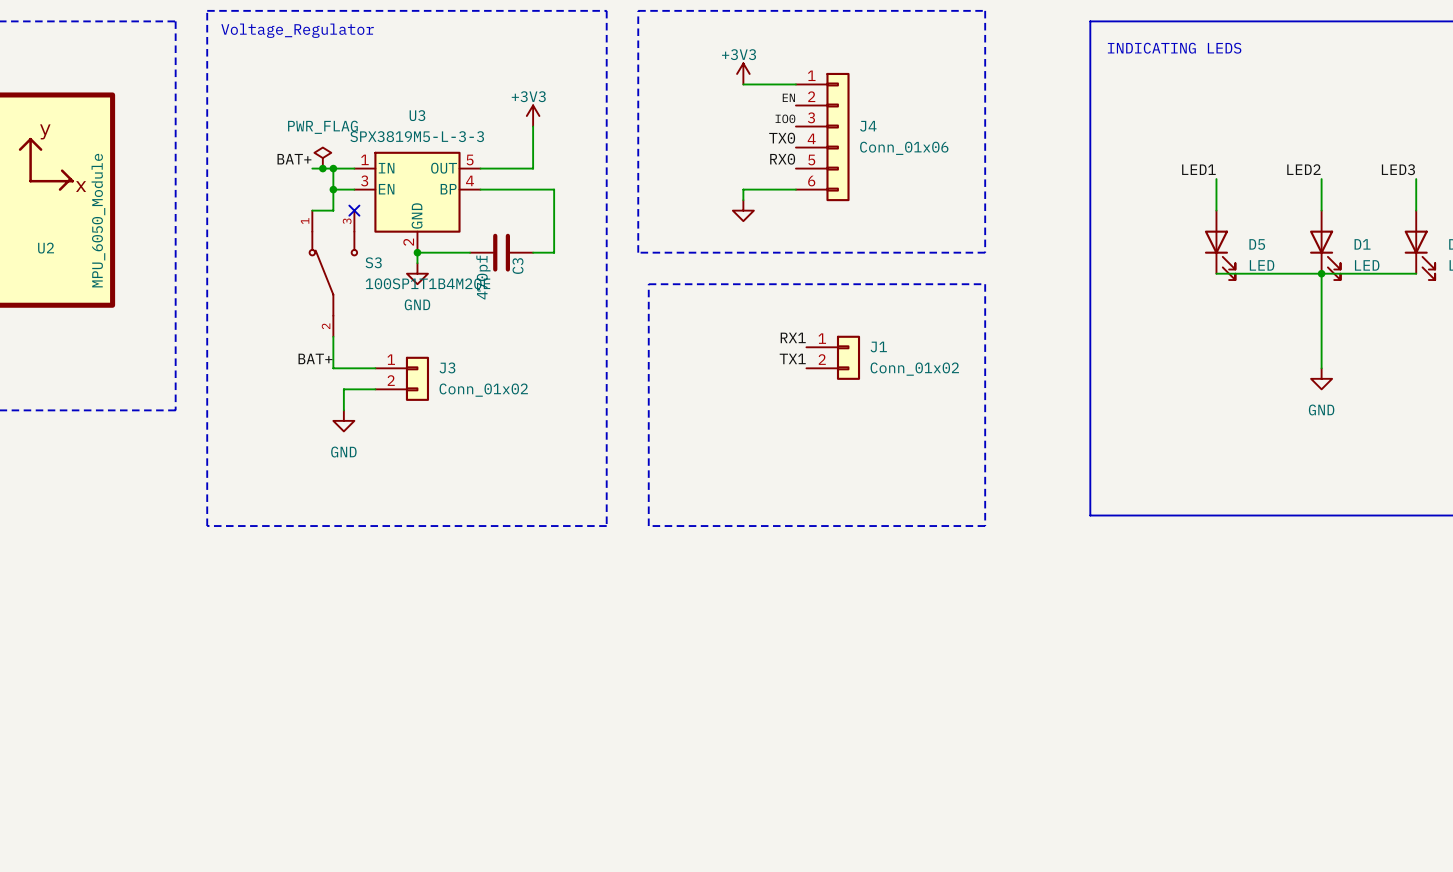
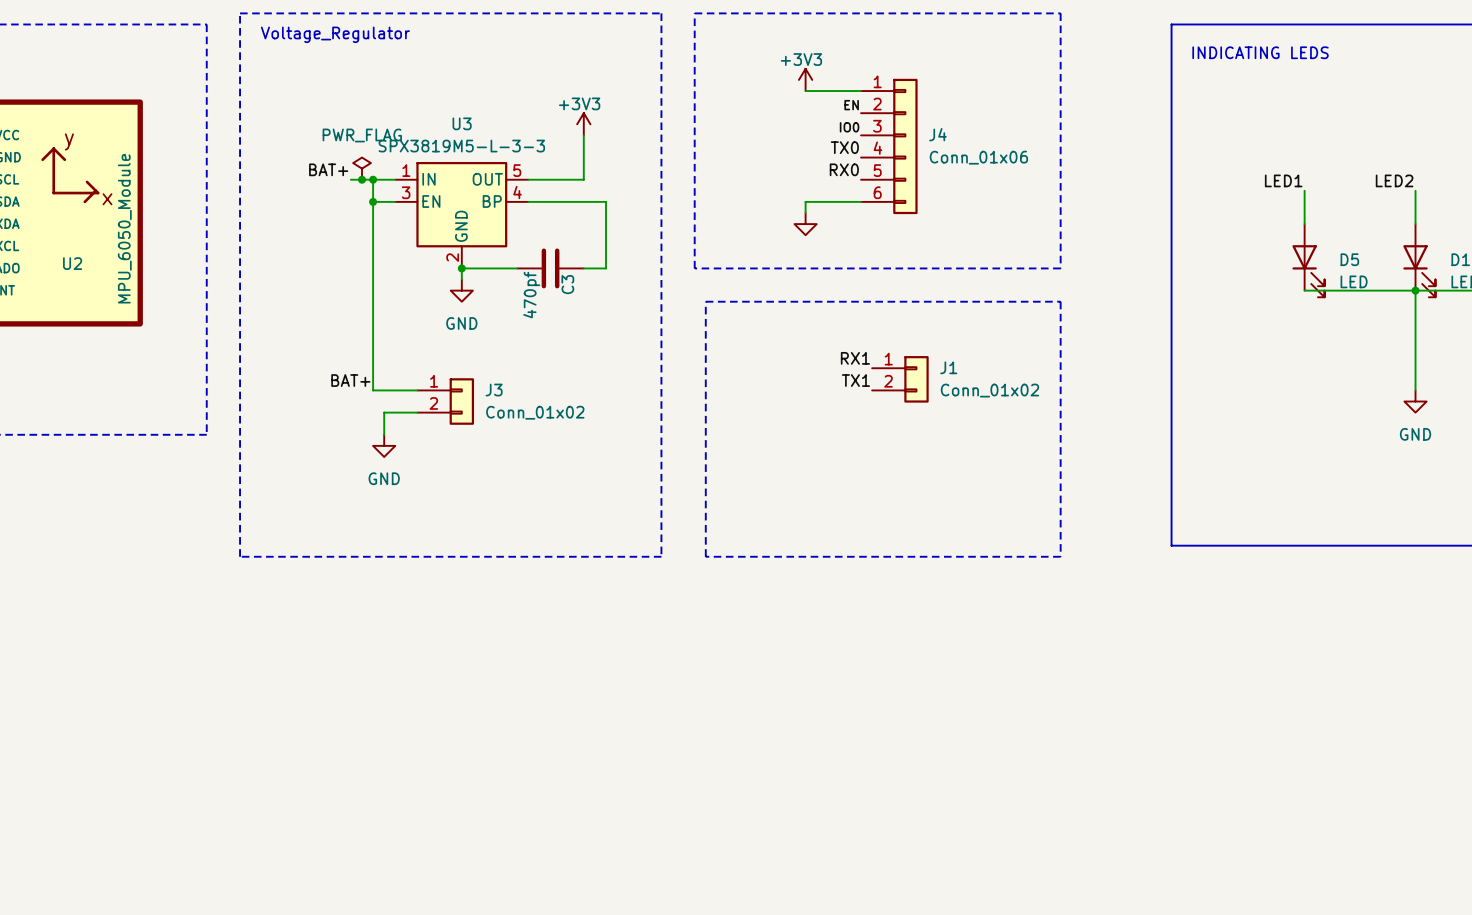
wire: (312, 210) (333, 210) -> (373, 357) (373, 224)
no-connect mark: (354, 210) -> none
S3: 100SP1T1B4M2QE (333, 273) -> none

